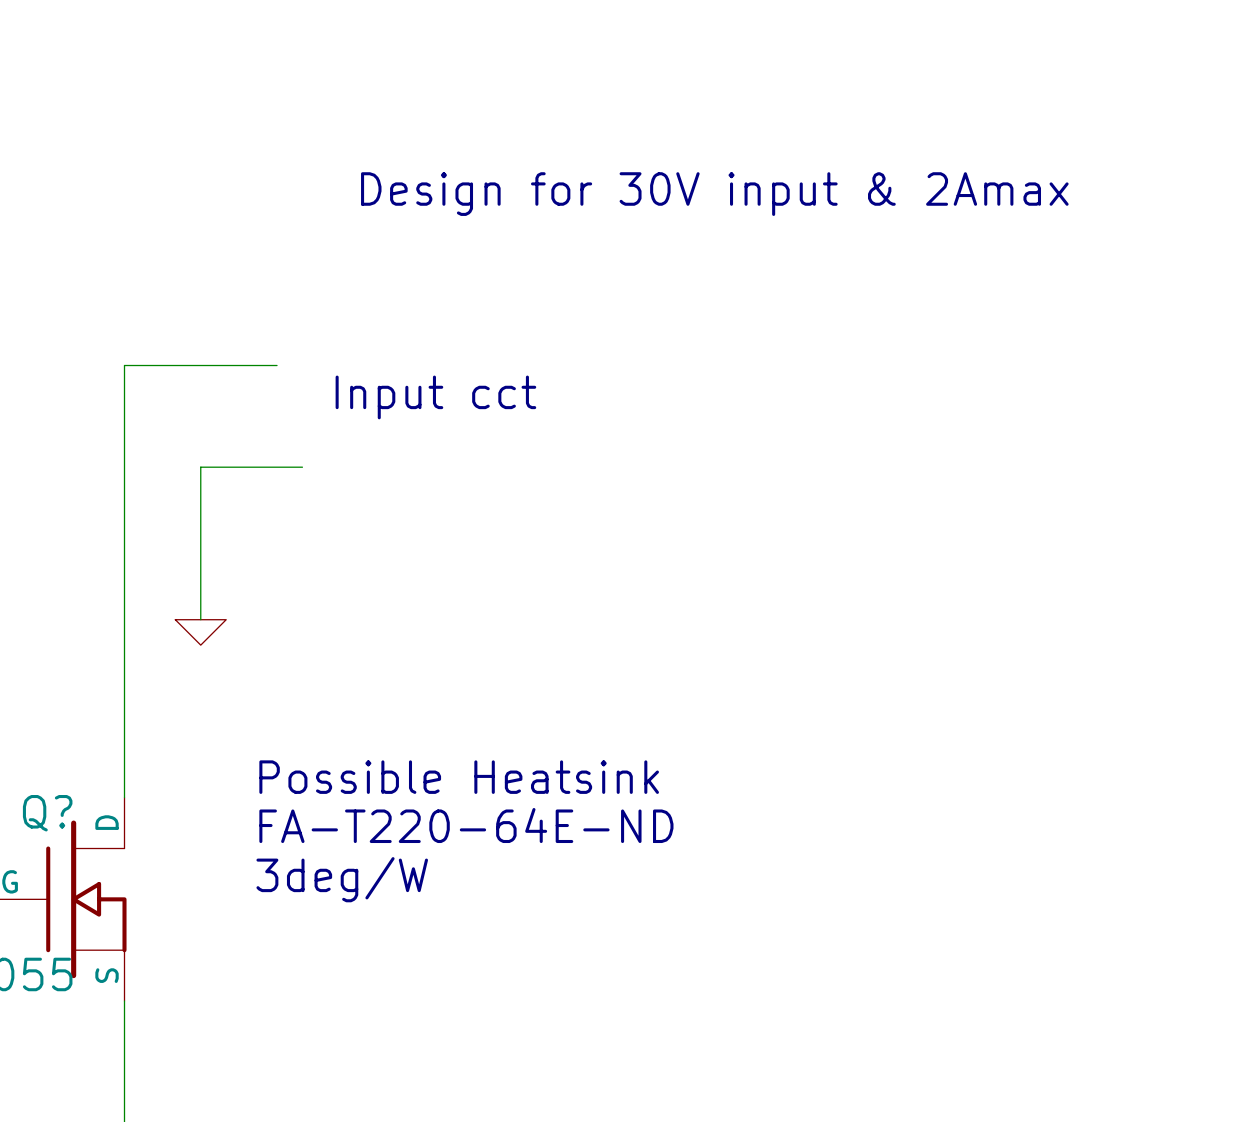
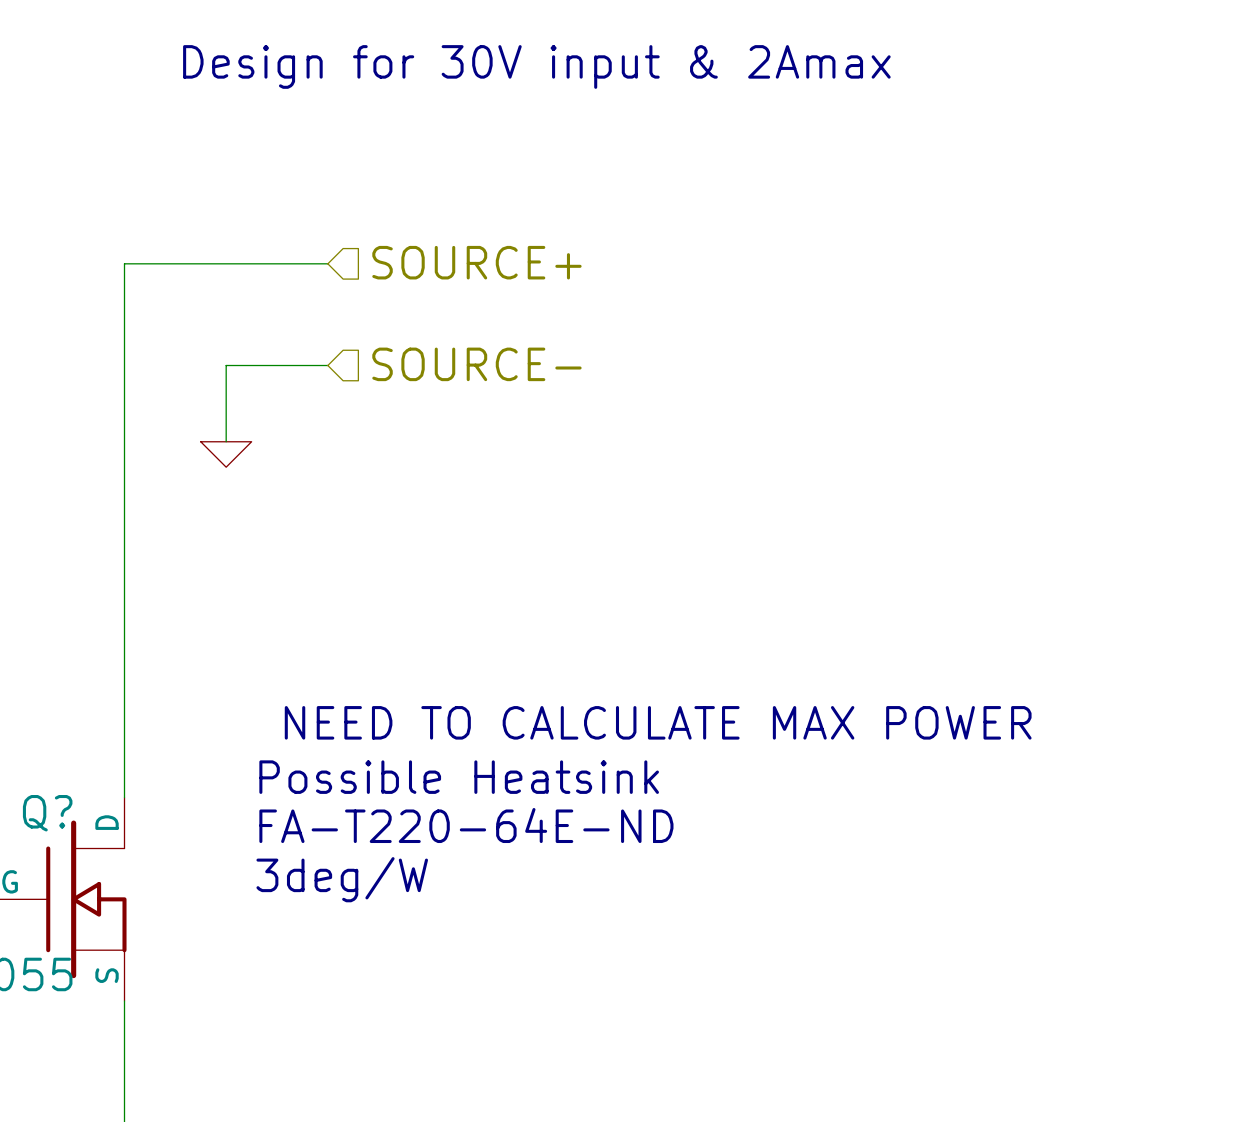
text position: Design for 30V input & 2Amax (714, 194) -> Design for 30V input & 2Amax (536, 66)
hierarchical label: none -> SOURCE+ (476, 262)
wire: none -> (327, 263) (124, 263) (124, 365)
hierarchical label: none -> SOURCE- (476, 364)
wire: (124, 365) (226, 365) -> (226, 441) (226, 365)
wire: none -> (277, 365) (327, 365)
text: Input cct (435, 397) -> none
wire: (302, 467) (200, 467) (200, 619) -> none
power symbol position: (200, 632) -> (226, 454)
text: none -> NEED TO CALCULATE MAX POWER (658, 722)

